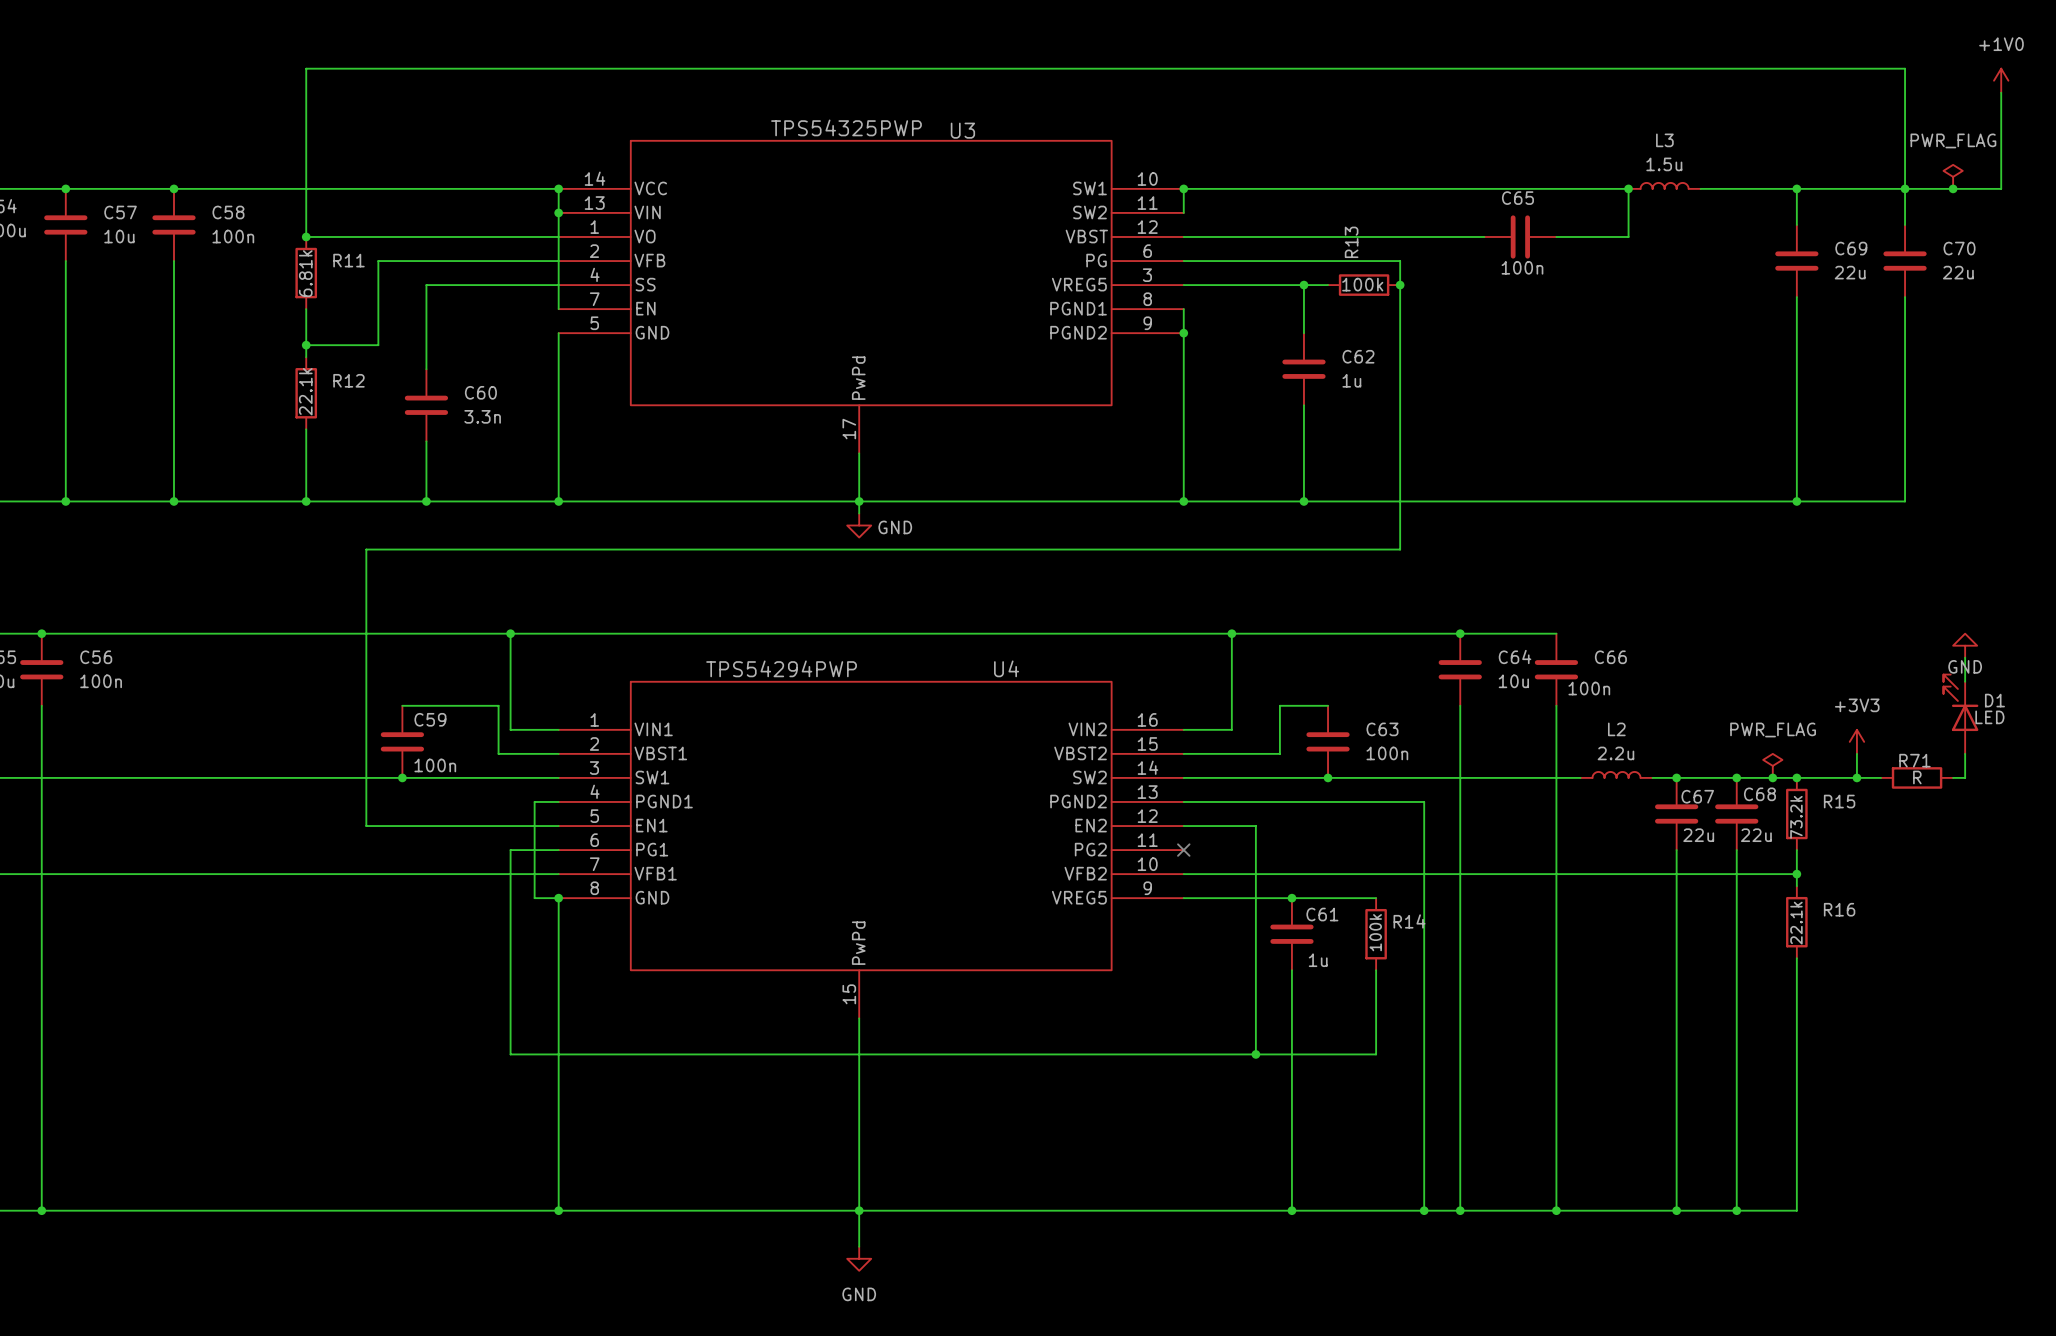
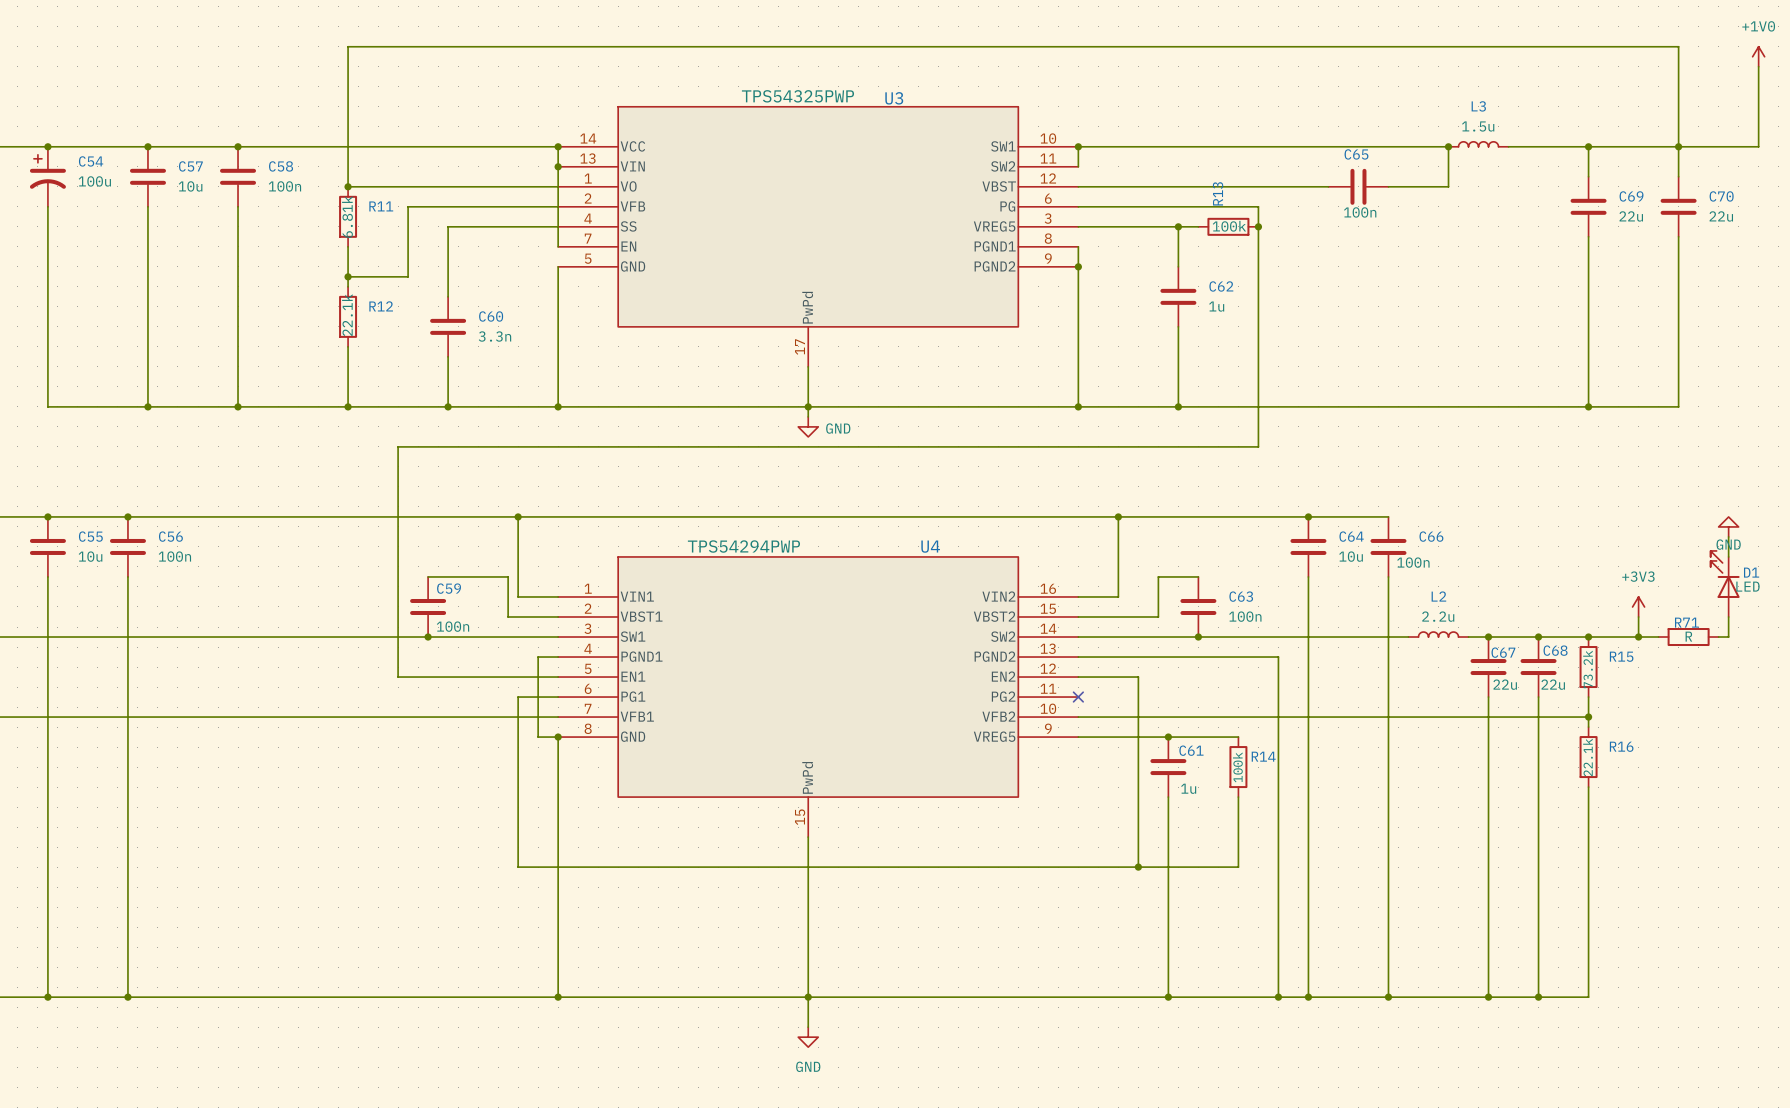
power symbol: PWR_FLAG (1953, 176) -> none
junction: (1953, 188) -> none
power symbol: PWR_FLAG (1772, 765) -> none
junction: (1772, 777) -> none

